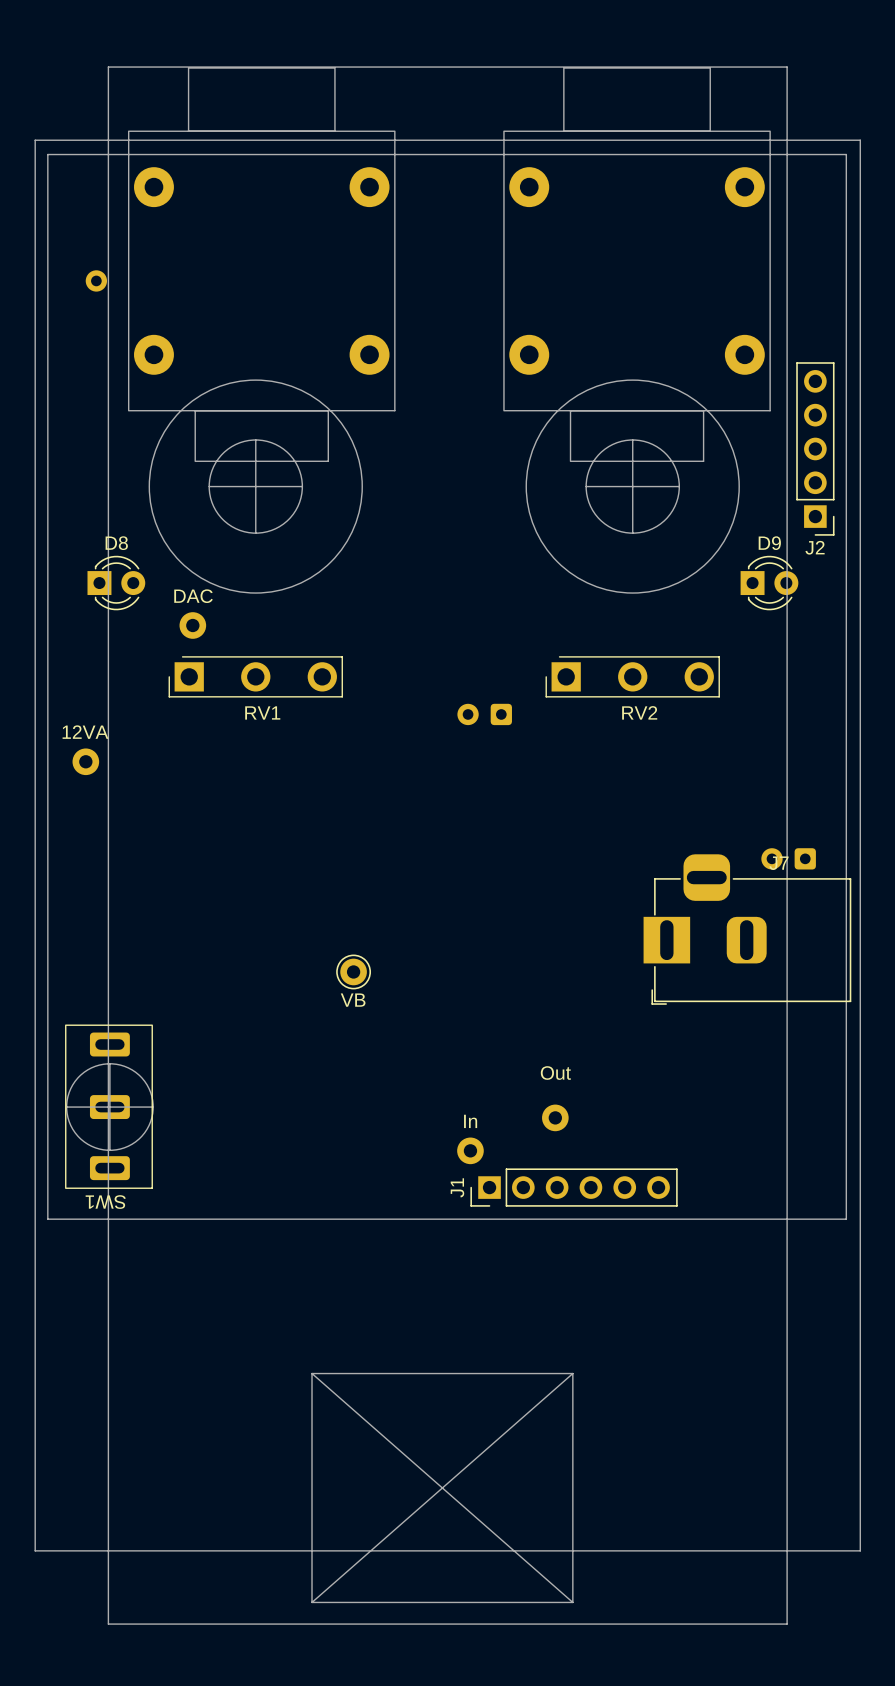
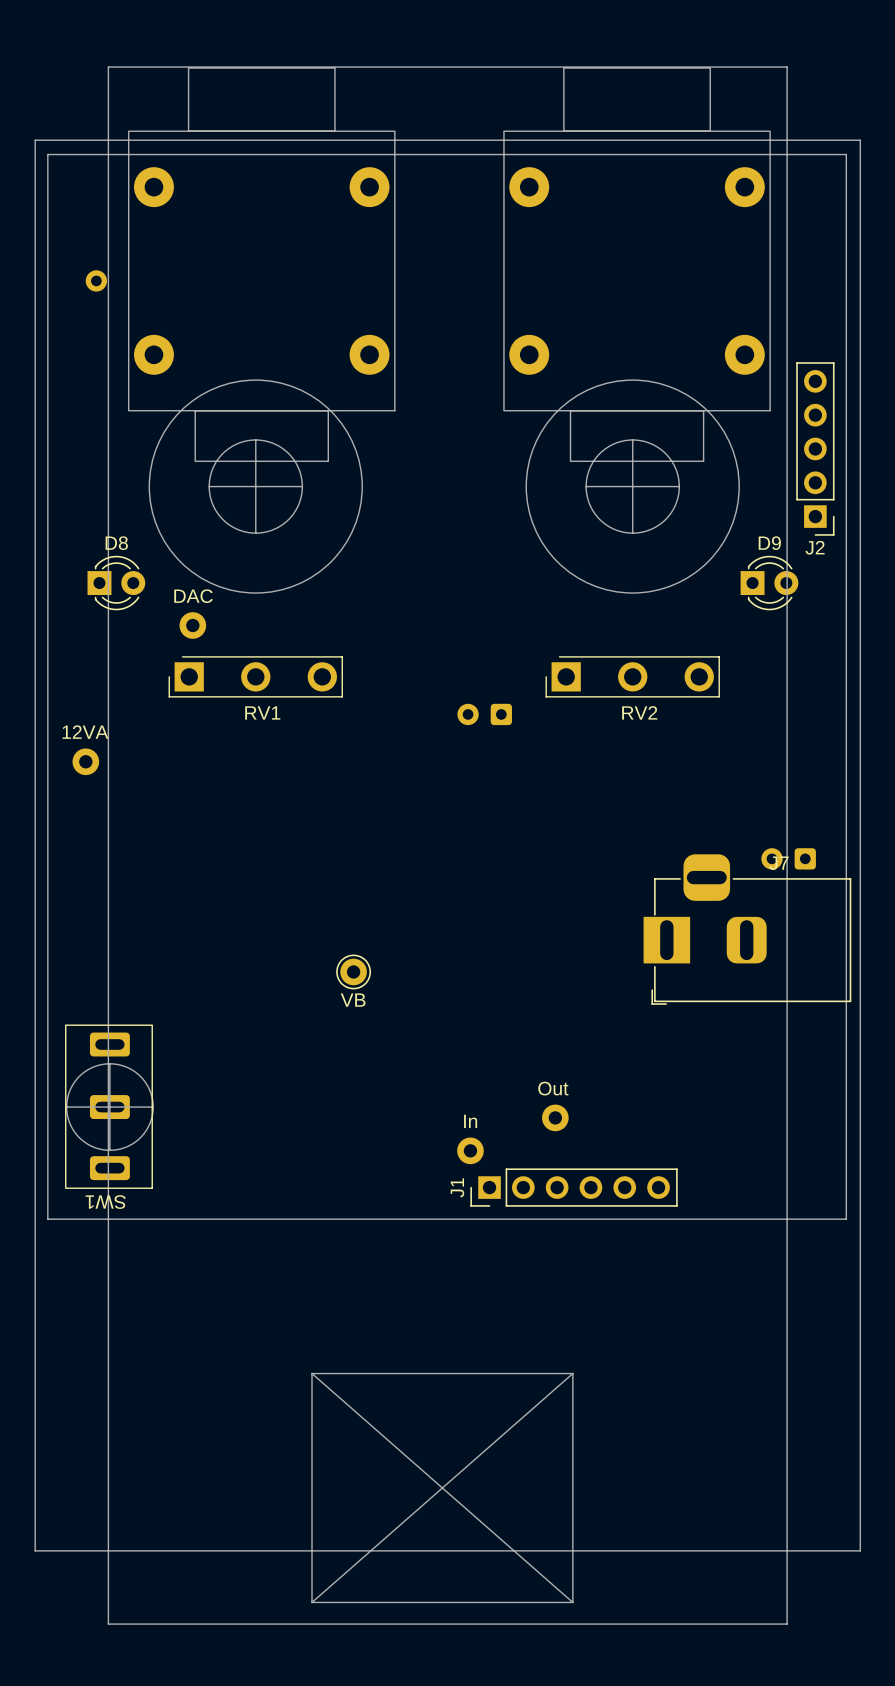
part value position: Out (555, 1073) -> Out (553, 1088)

